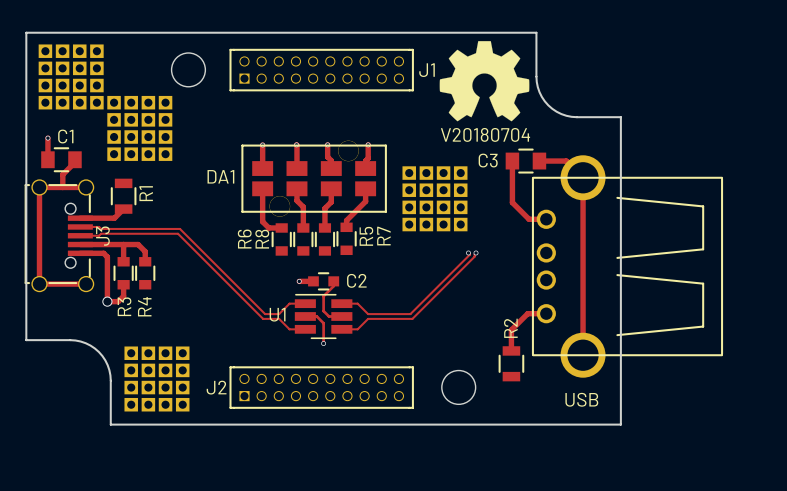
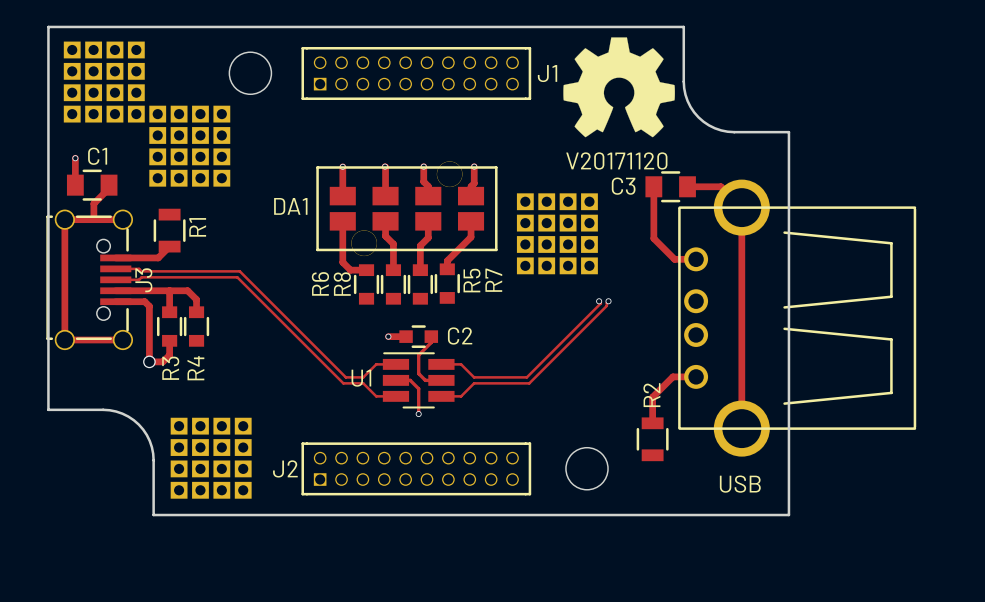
drawing shape: [440, 127, 531, 142] -> [566, 152, 668, 170]

